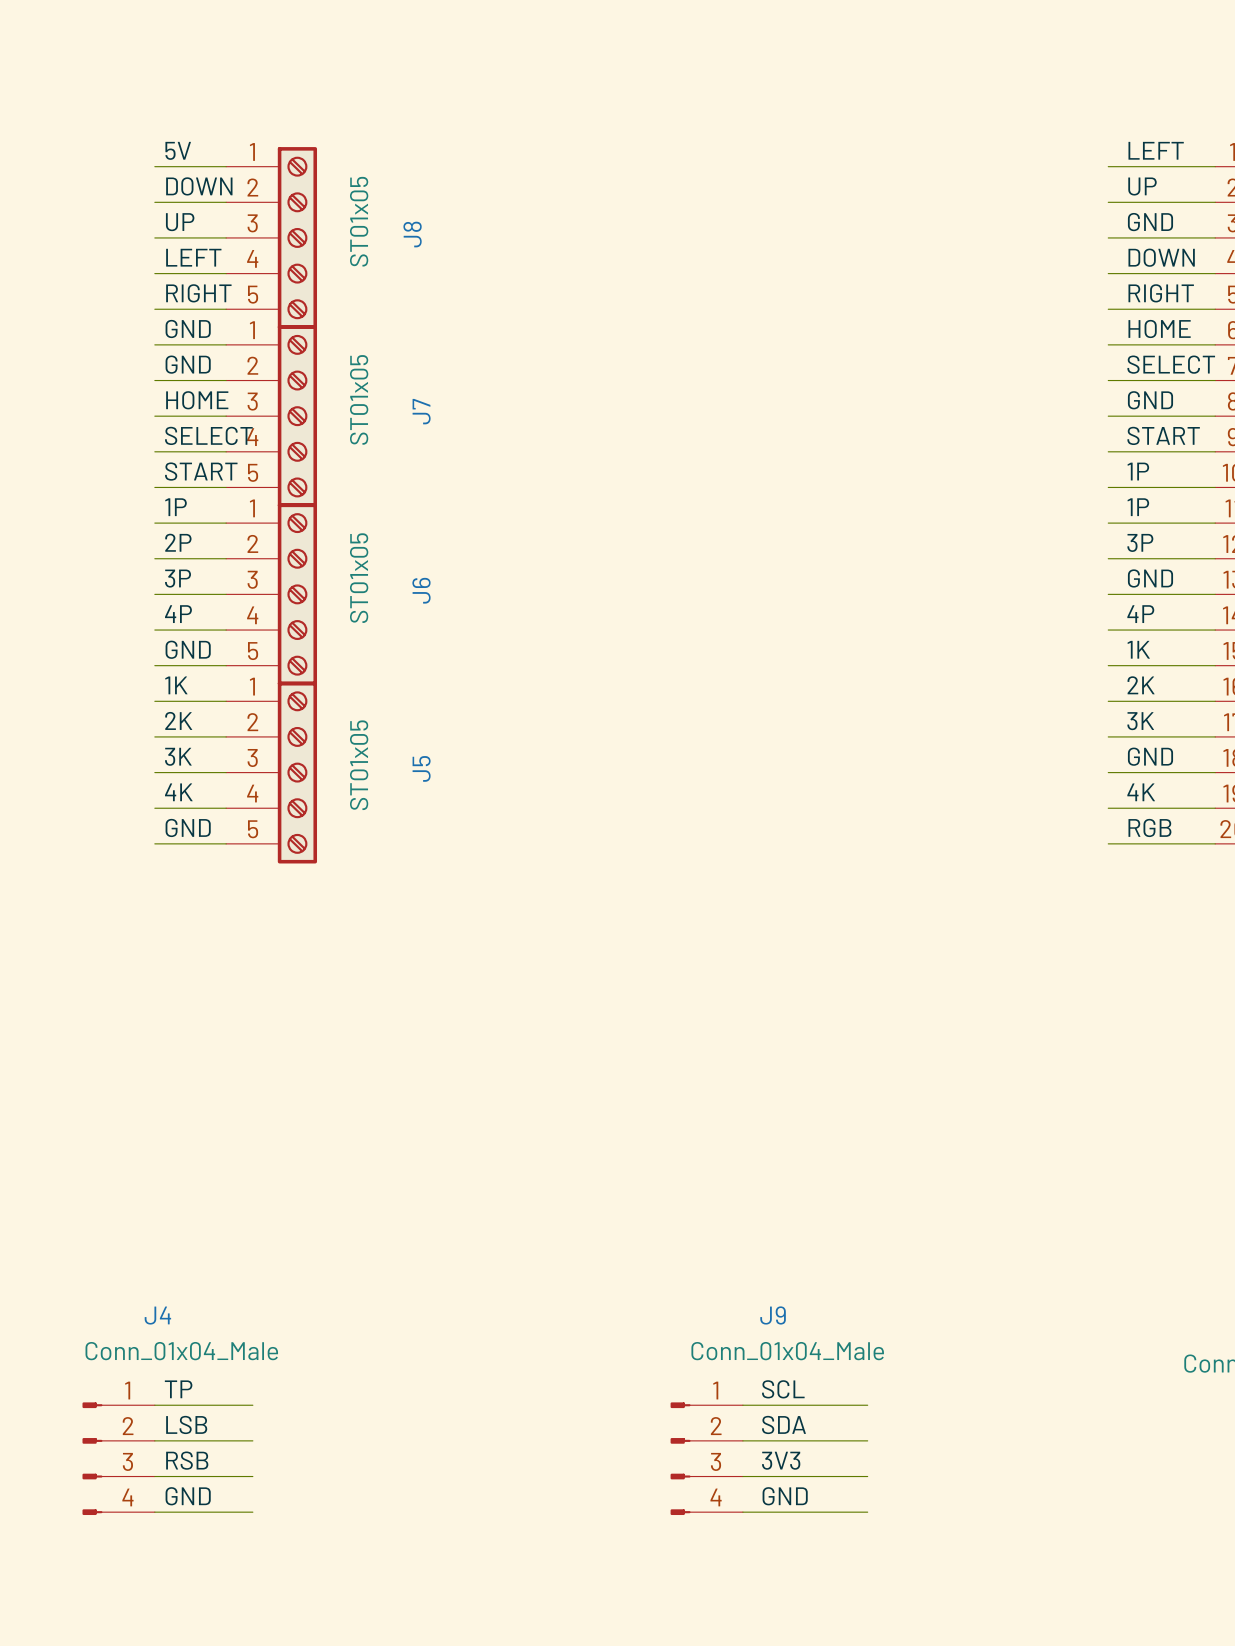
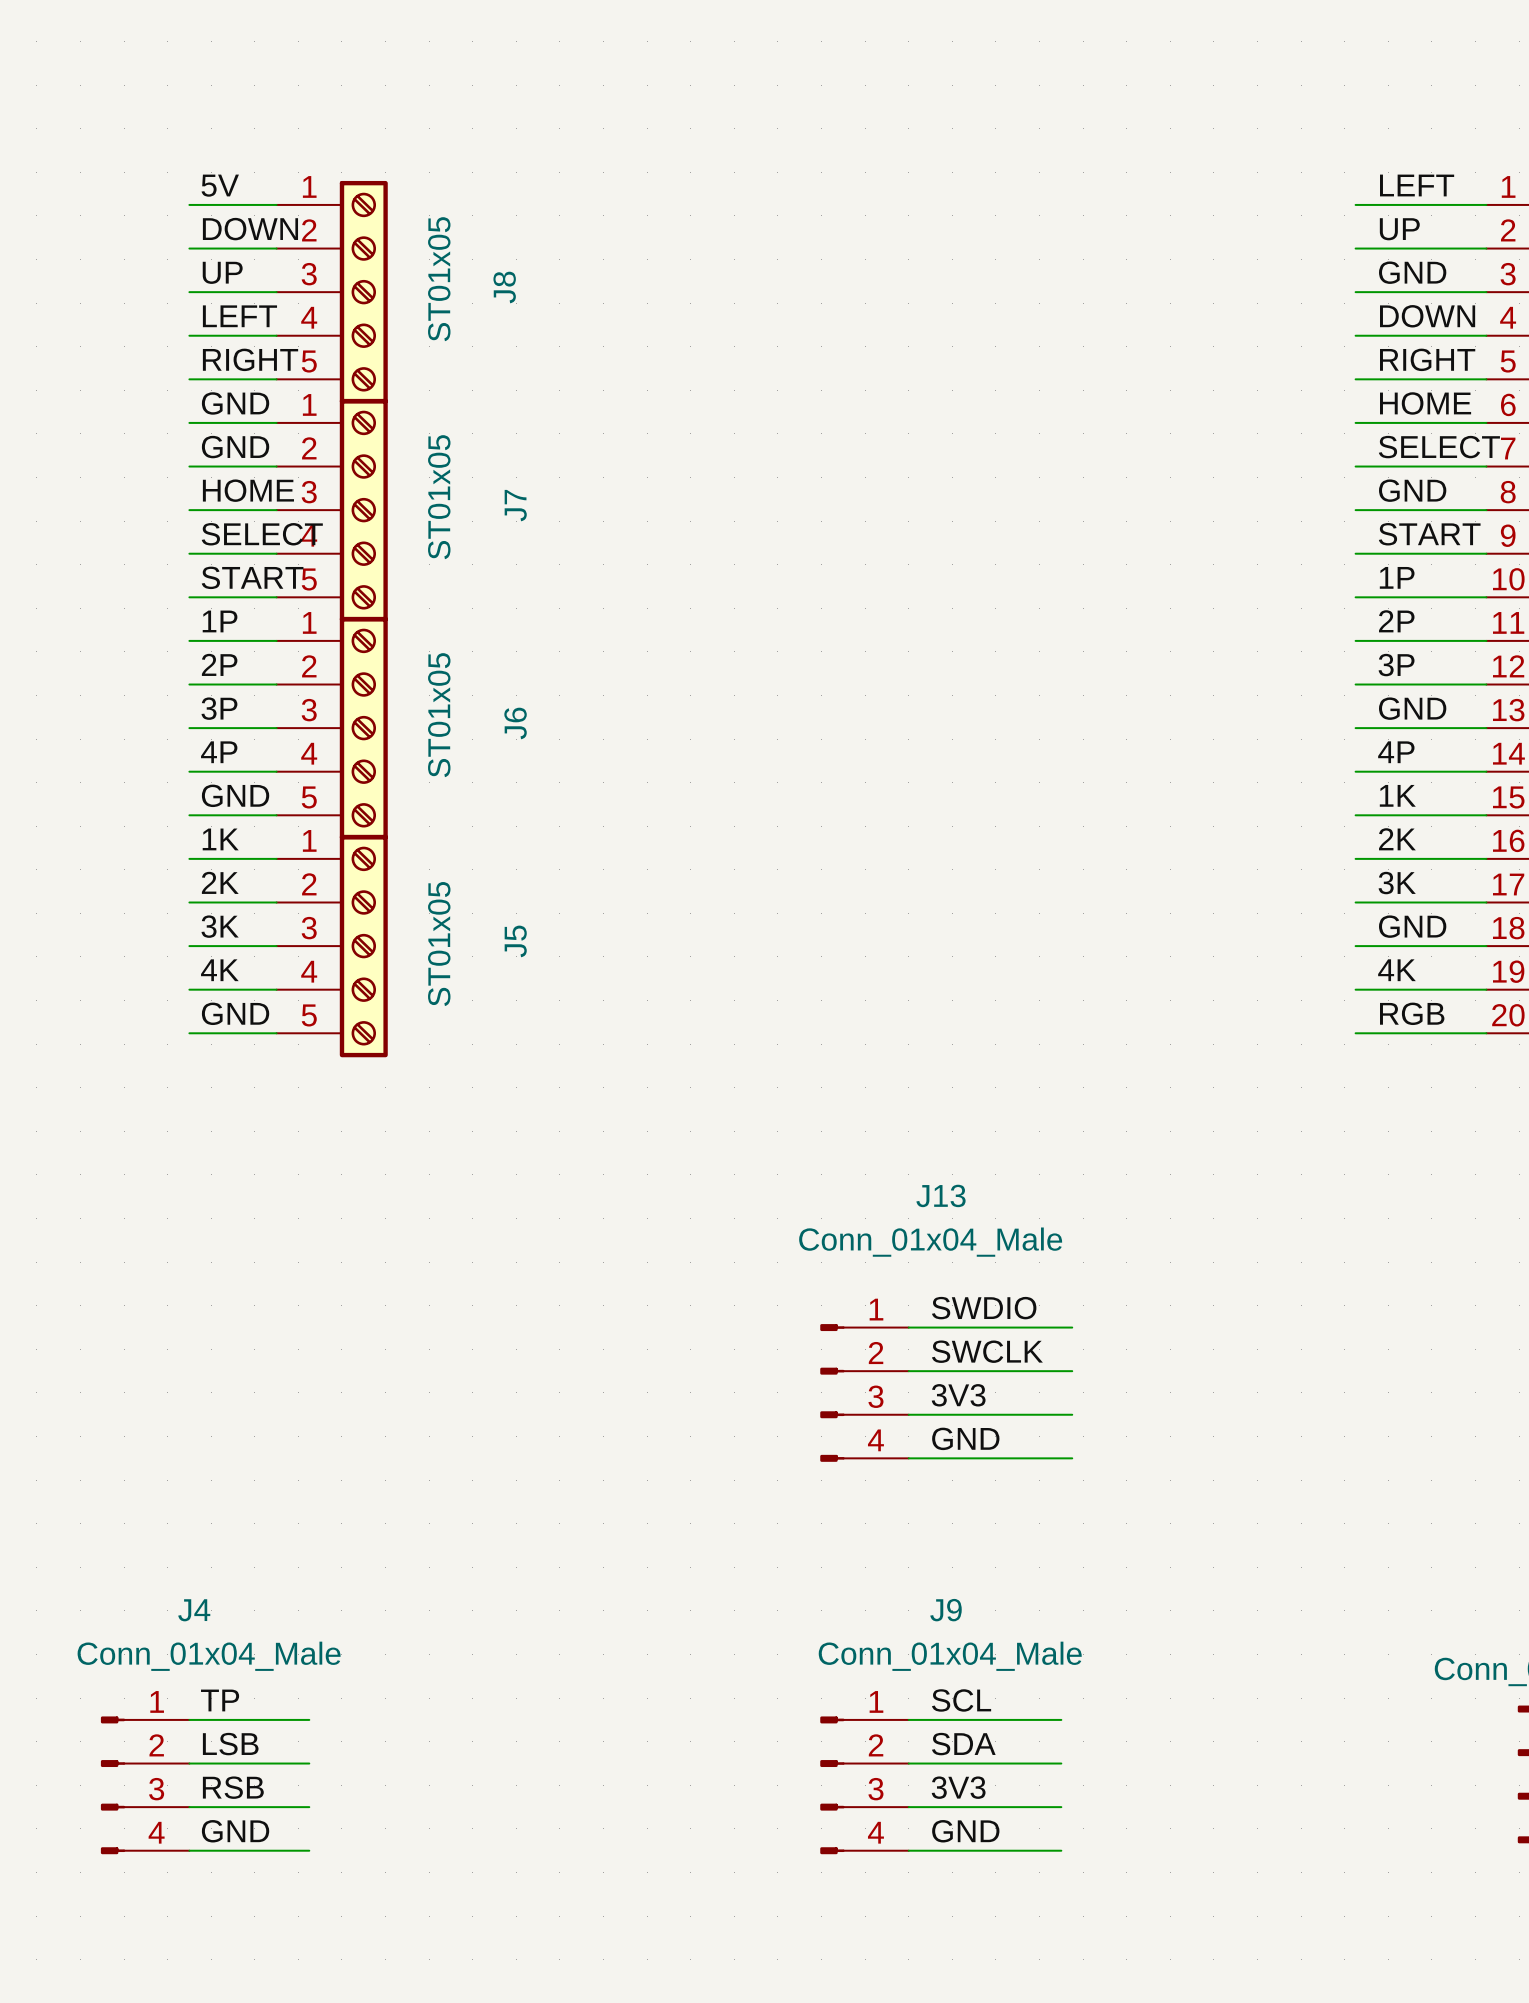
label: 1P (1138, 507) -> 2P (1396, 621)
label: none -> SWDIO (984, 1308)
wire: none -> (908, 1327) (1072, 1327)
label: none -> SWCLK (987, 1351)
wire: none -> (908, 1371) (1072, 1371)
J13: none -> Conn_01x04_Male (864, 1392)
label: none -> 3V3 (958, 1395)
wire: none -> (908, 1414) (1072, 1414)
label: none -> GND (965, 1438)
wire: none -> (908, 1458) (1072, 1458)

